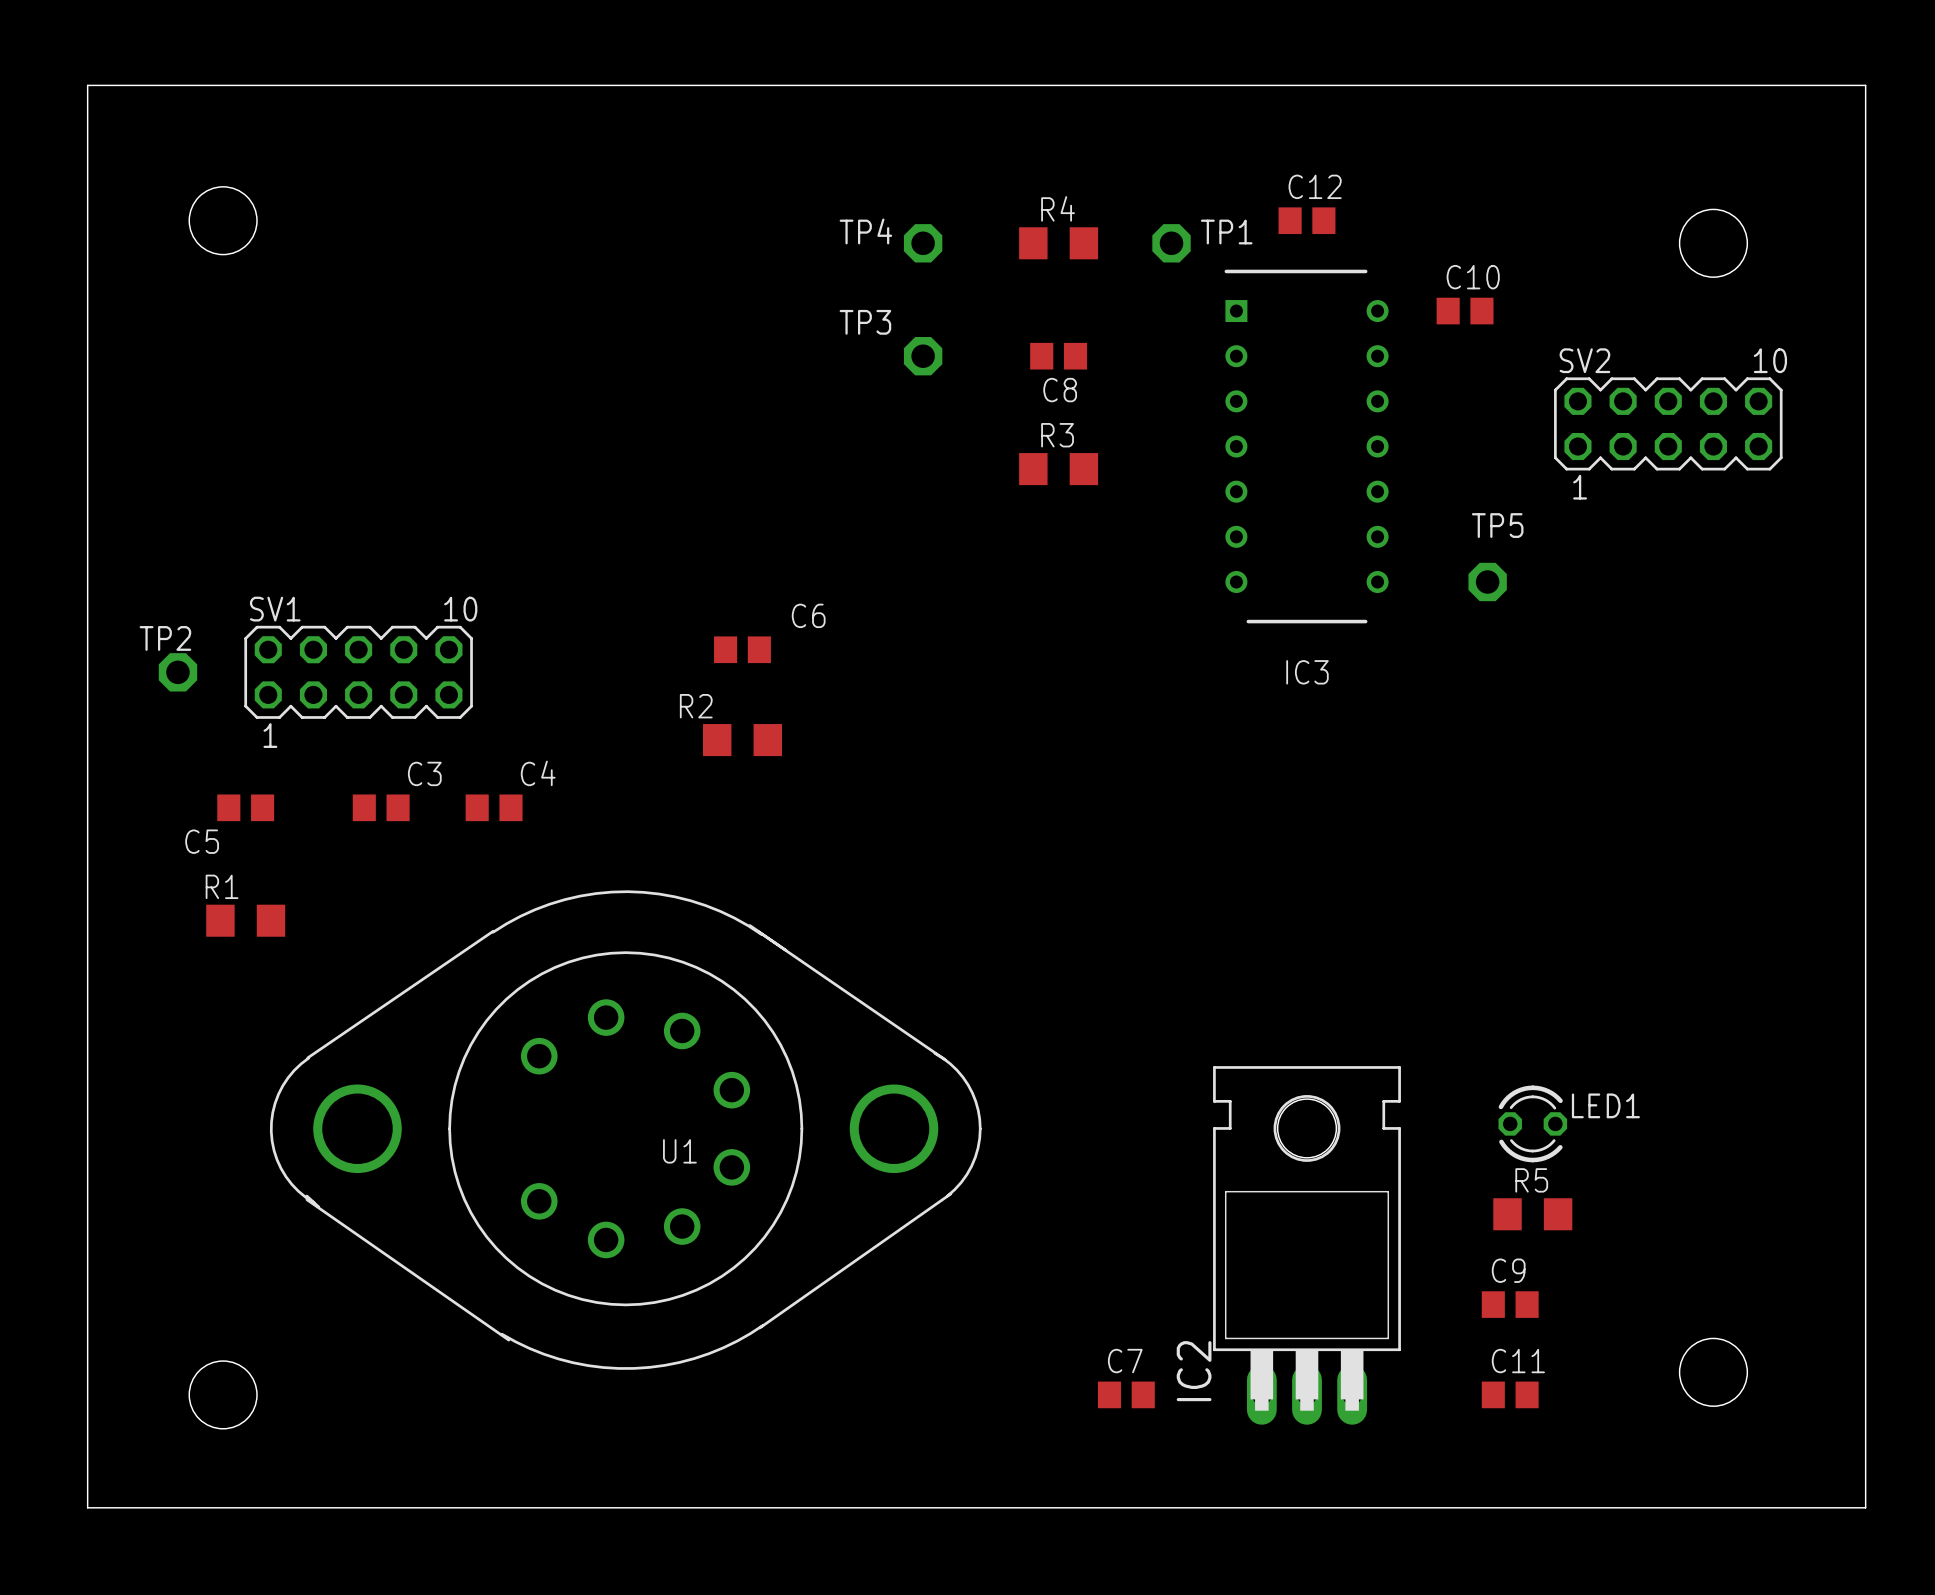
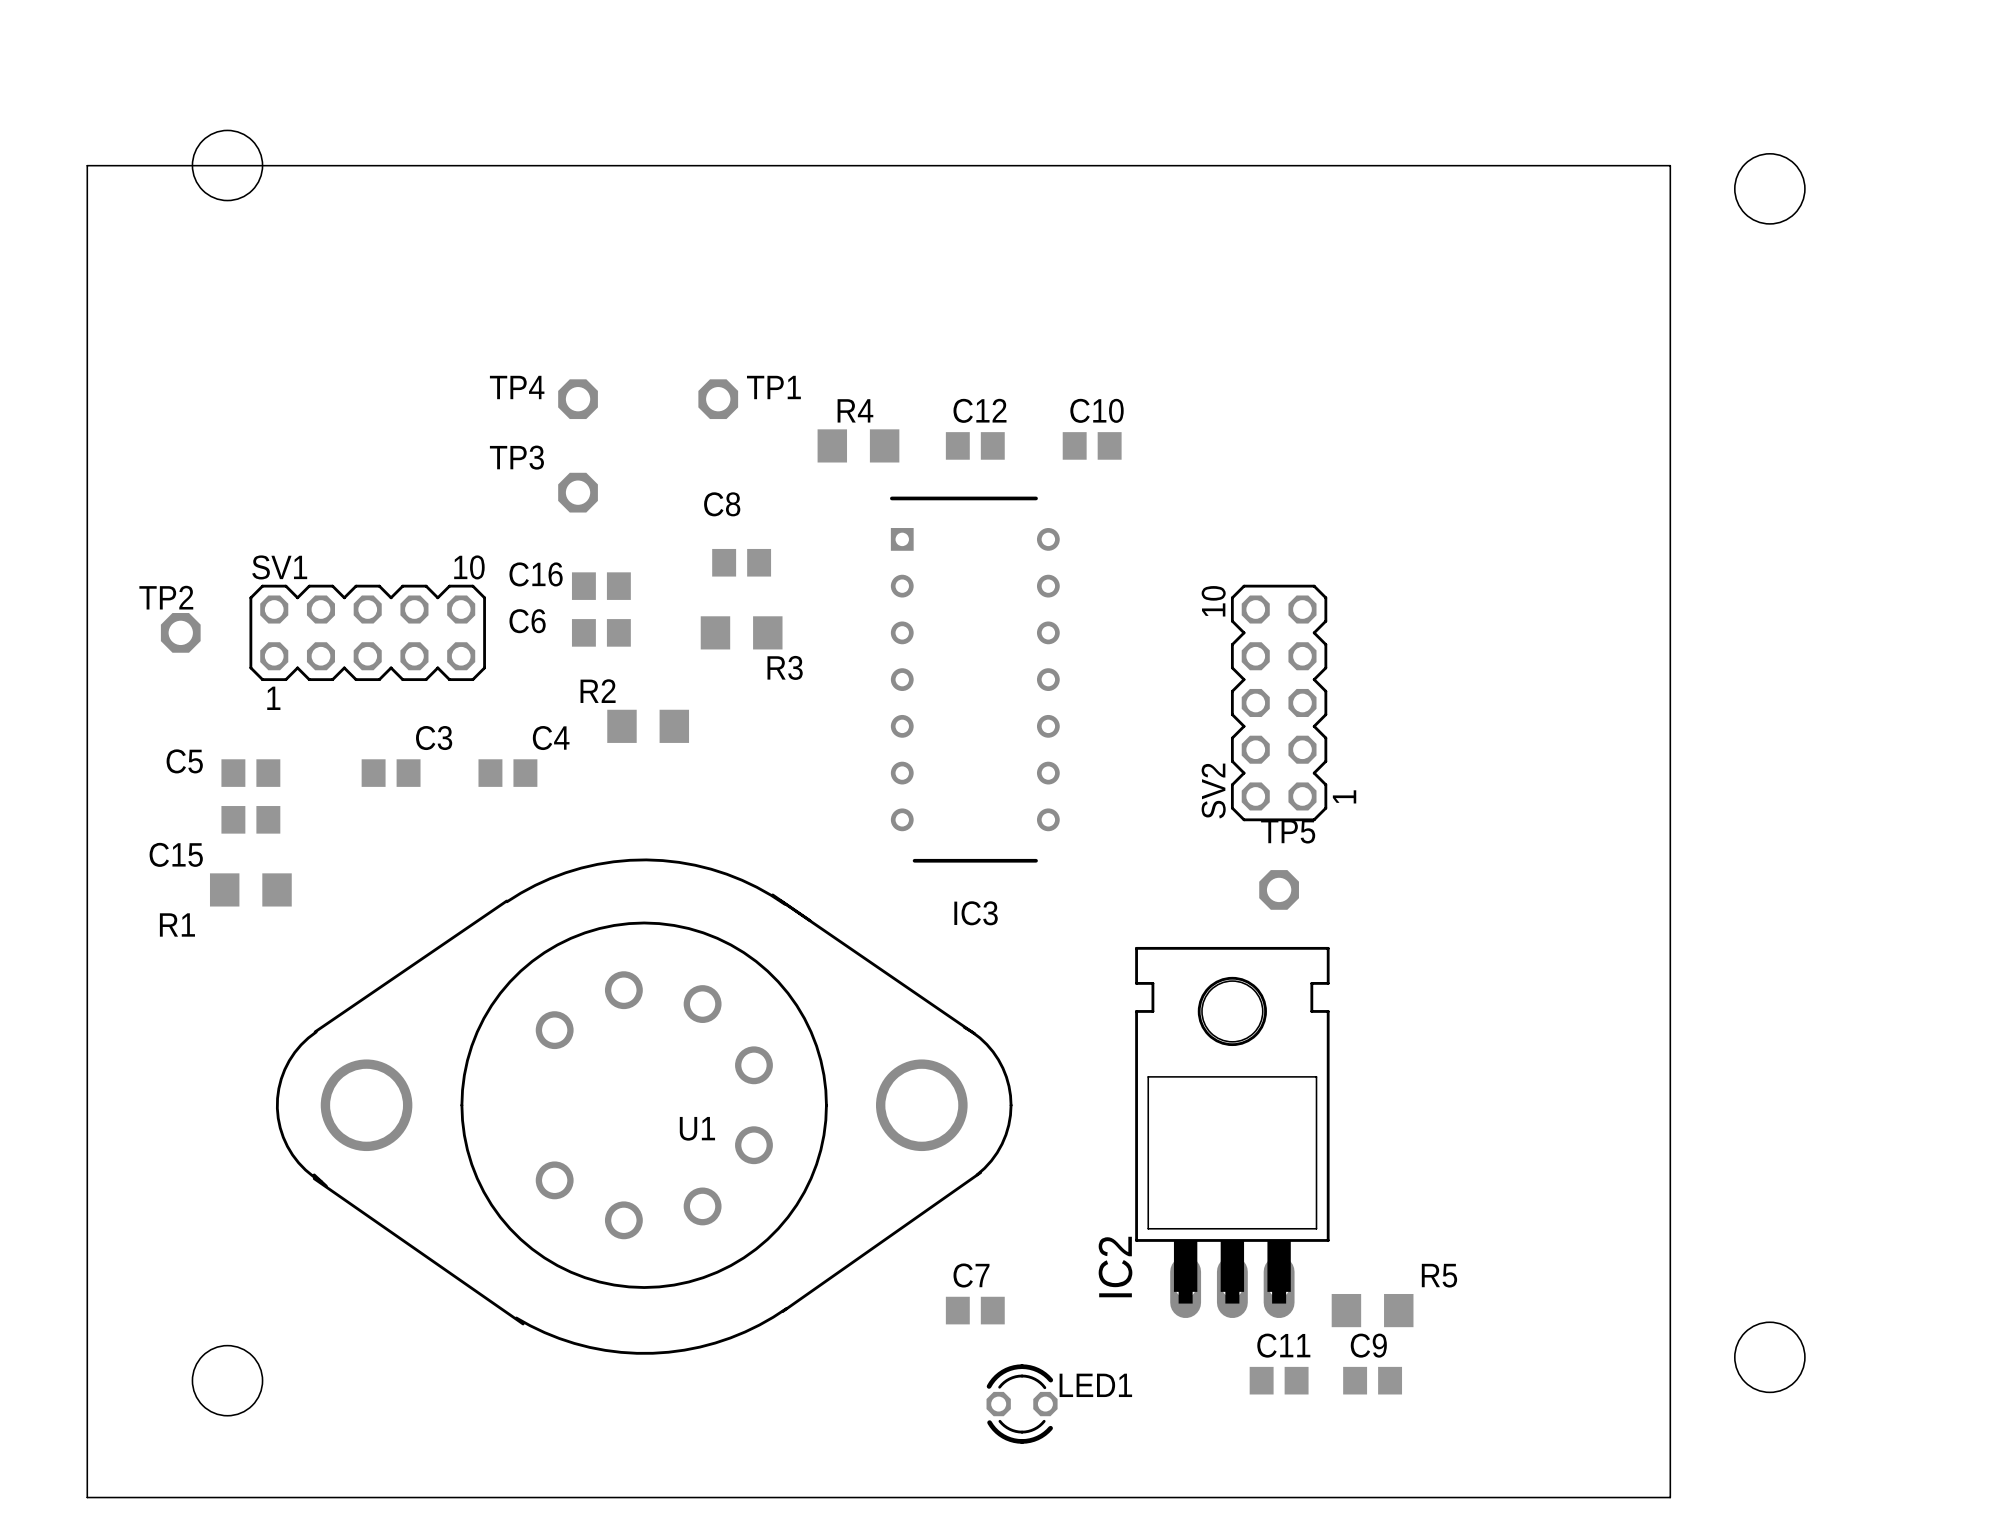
board edge: (87, 220) (87, 85) (1865, 85) (1865, 1507) (1617, 1507) -> (87, 165) (1670, 165) (1670, 1497)
C12 position: (1307, 220) -> (975, 445)
TP4 position: (923, 243) -> (578, 399)
R4 position: (1058, 243) -> (858, 445)
TP1 position: (1171, 243) -> (718, 399)
C10 position: (1465, 311) -> (1092, 445)
TP3 position: (923, 356) -> (578, 492)
C8 position: (1058, 356) -> (741, 562)
C8 name position: C8 (1060, 390) -> C8 (722, 504)
SV2 rotation: 0° (1668, 423) -> 90° counterclockwise (1279, 702)
SV2 position: (1668, 423) -> (1279, 702)
R3 name position: R3 (1057, 435) -> R3 (785, 667)
IC3 position: (1306, 446) -> (974, 679)
R3 position: (1058, 469) -> (741, 632)
TP5 position: (1487, 582) -> (1279, 889)
C6 name position: C6 (808, 615) -> C6 (527, 621)
C16: none -> (601, 586)
C6 position: (742, 649) -> (601, 632)
R2 position: (742, 740) -> (648, 726)
C5 name position: C5 (202, 841) -> C5 (184, 761)
C15: none -> (250, 819)
R1 name position: R1 (222, 886) -> R1 (177, 924)
LED1 position: (1532, 1123) -> (1022, 1404)
R5 name position: R5 (1531, 1180) -> R5 (1439, 1275)
R5 position: (1532, 1214) -> (1372, 1310)
IC2 position: (1307, 1245) -> (1232, 1132)
C9 position: (1510, 1304) -> (1372, 1380)
C7 position: (1126, 1394) -> (975, 1310)
C11 position: (1510, 1394) -> (1279, 1380)

